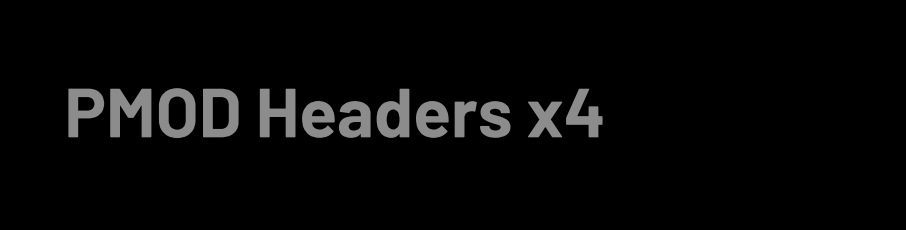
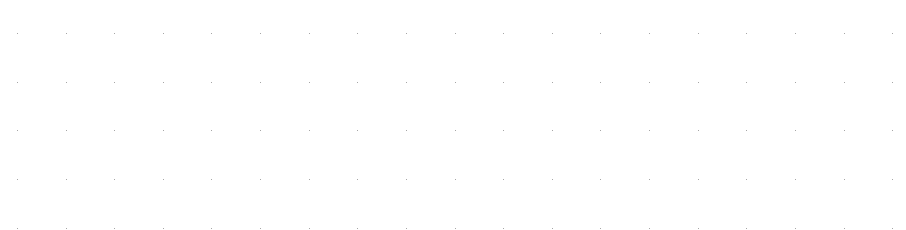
text: PMOD Headers x4 (335, 113) -> none

